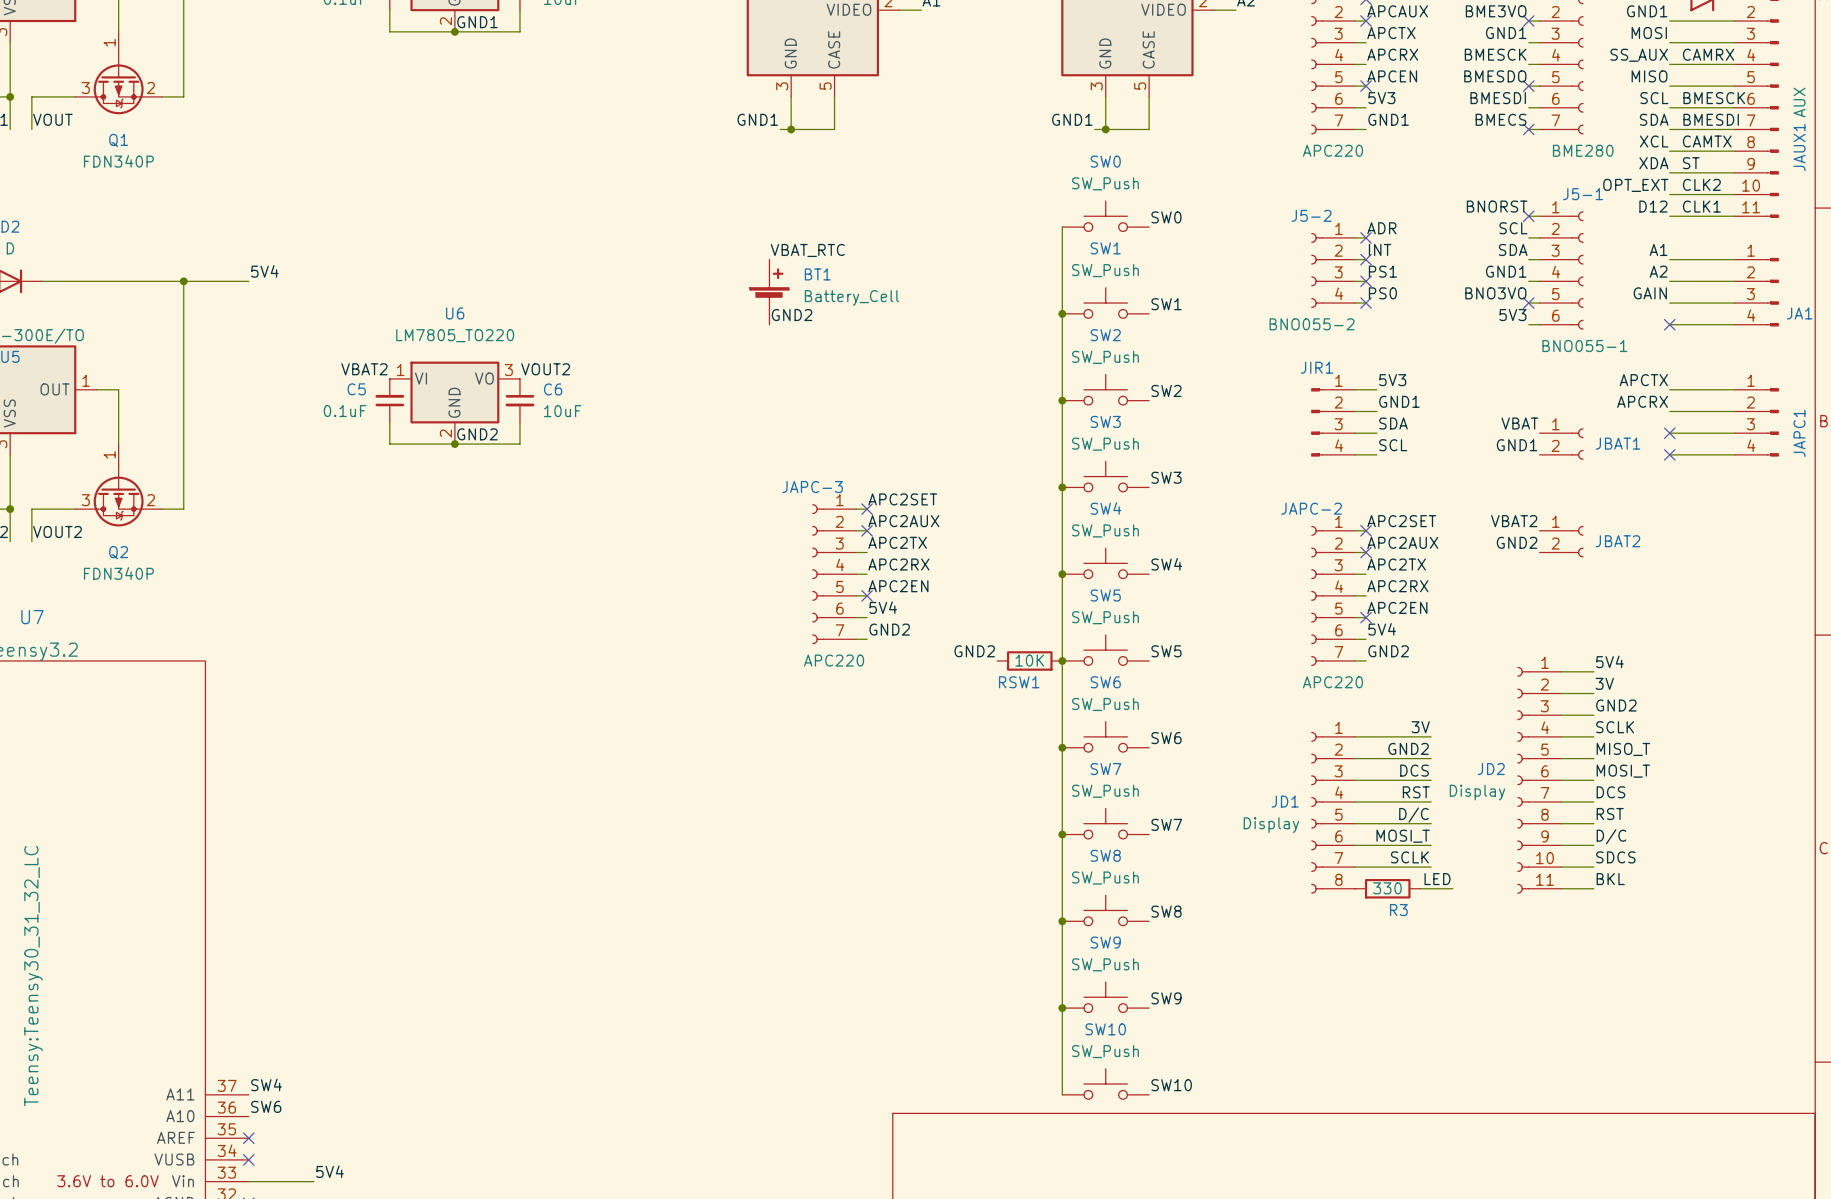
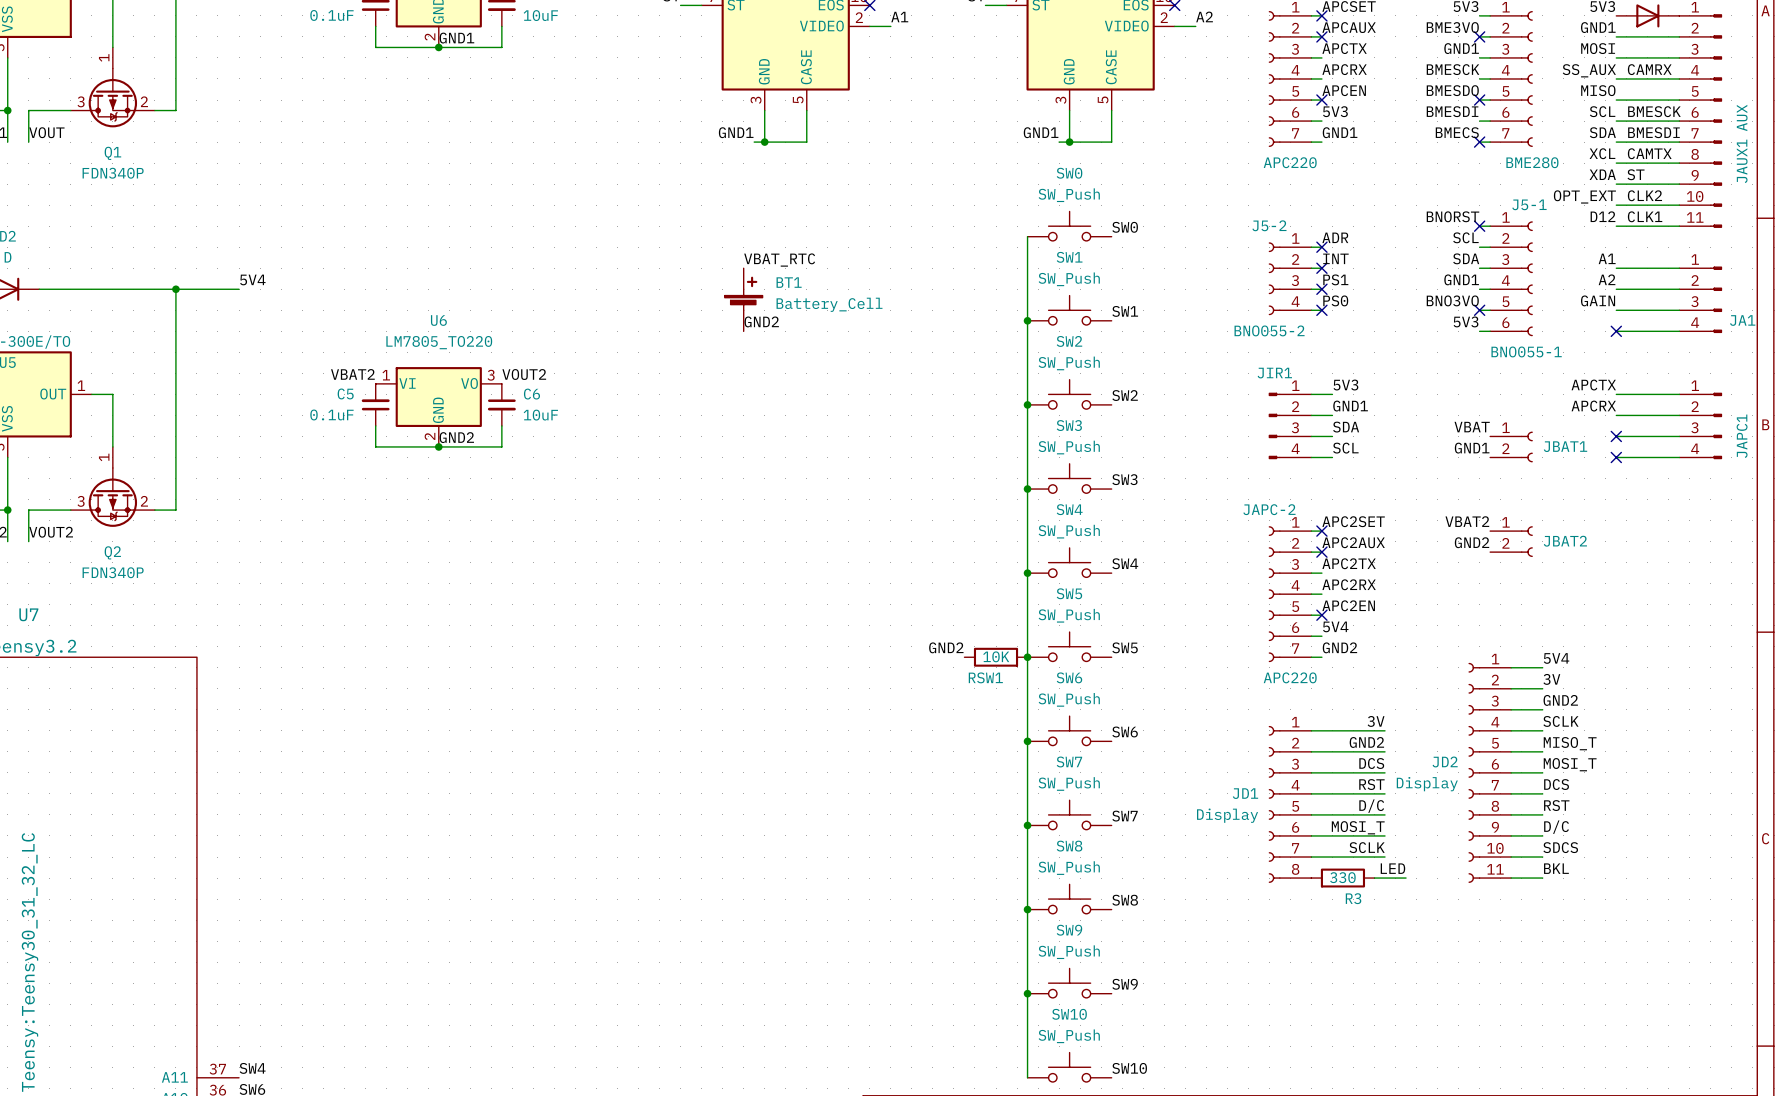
label: APC2SET (902, 499) -> none
wire: (856, 509) (867, 509) -> none
no-connect mark: (867, 509) -> none
label: APC2AUX (903, 521) -> none
wire: (856, 530) (867, 530) -> none
no-connect mark: (867, 530) -> none
label: APC2TX (897, 542) -> none
wire: (856, 552) (867, 552) -> none
label: APC2RX (898, 564) -> none
JAPC-3: APC220 (834, 574) -> none
wire: (856, 574) (867, 574) -> none
label: APC2EN (898, 586) -> none
wire: (856, 595) (867, 595) -> none
no-connect mark: (867, 595) -> none
label: 5V4 (883, 607) -> none
wire: (856, 617) (867, 617) -> none
label: GND2 (889, 629) -> none
wire: (856, 639) (867, 639) -> none

